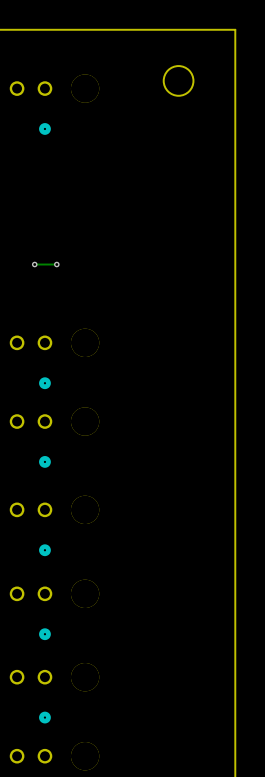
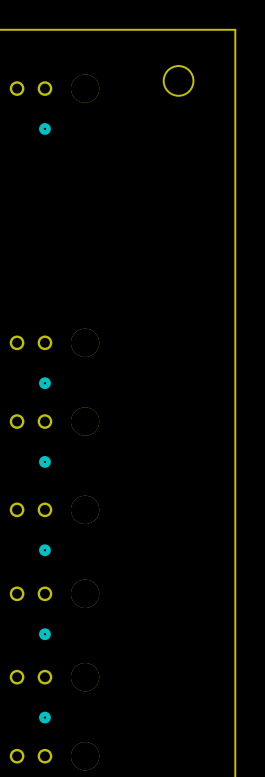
via: (34, 264) -> none
track: (56, 264) (34, 264) -> none
via: (56, 264) -> none

